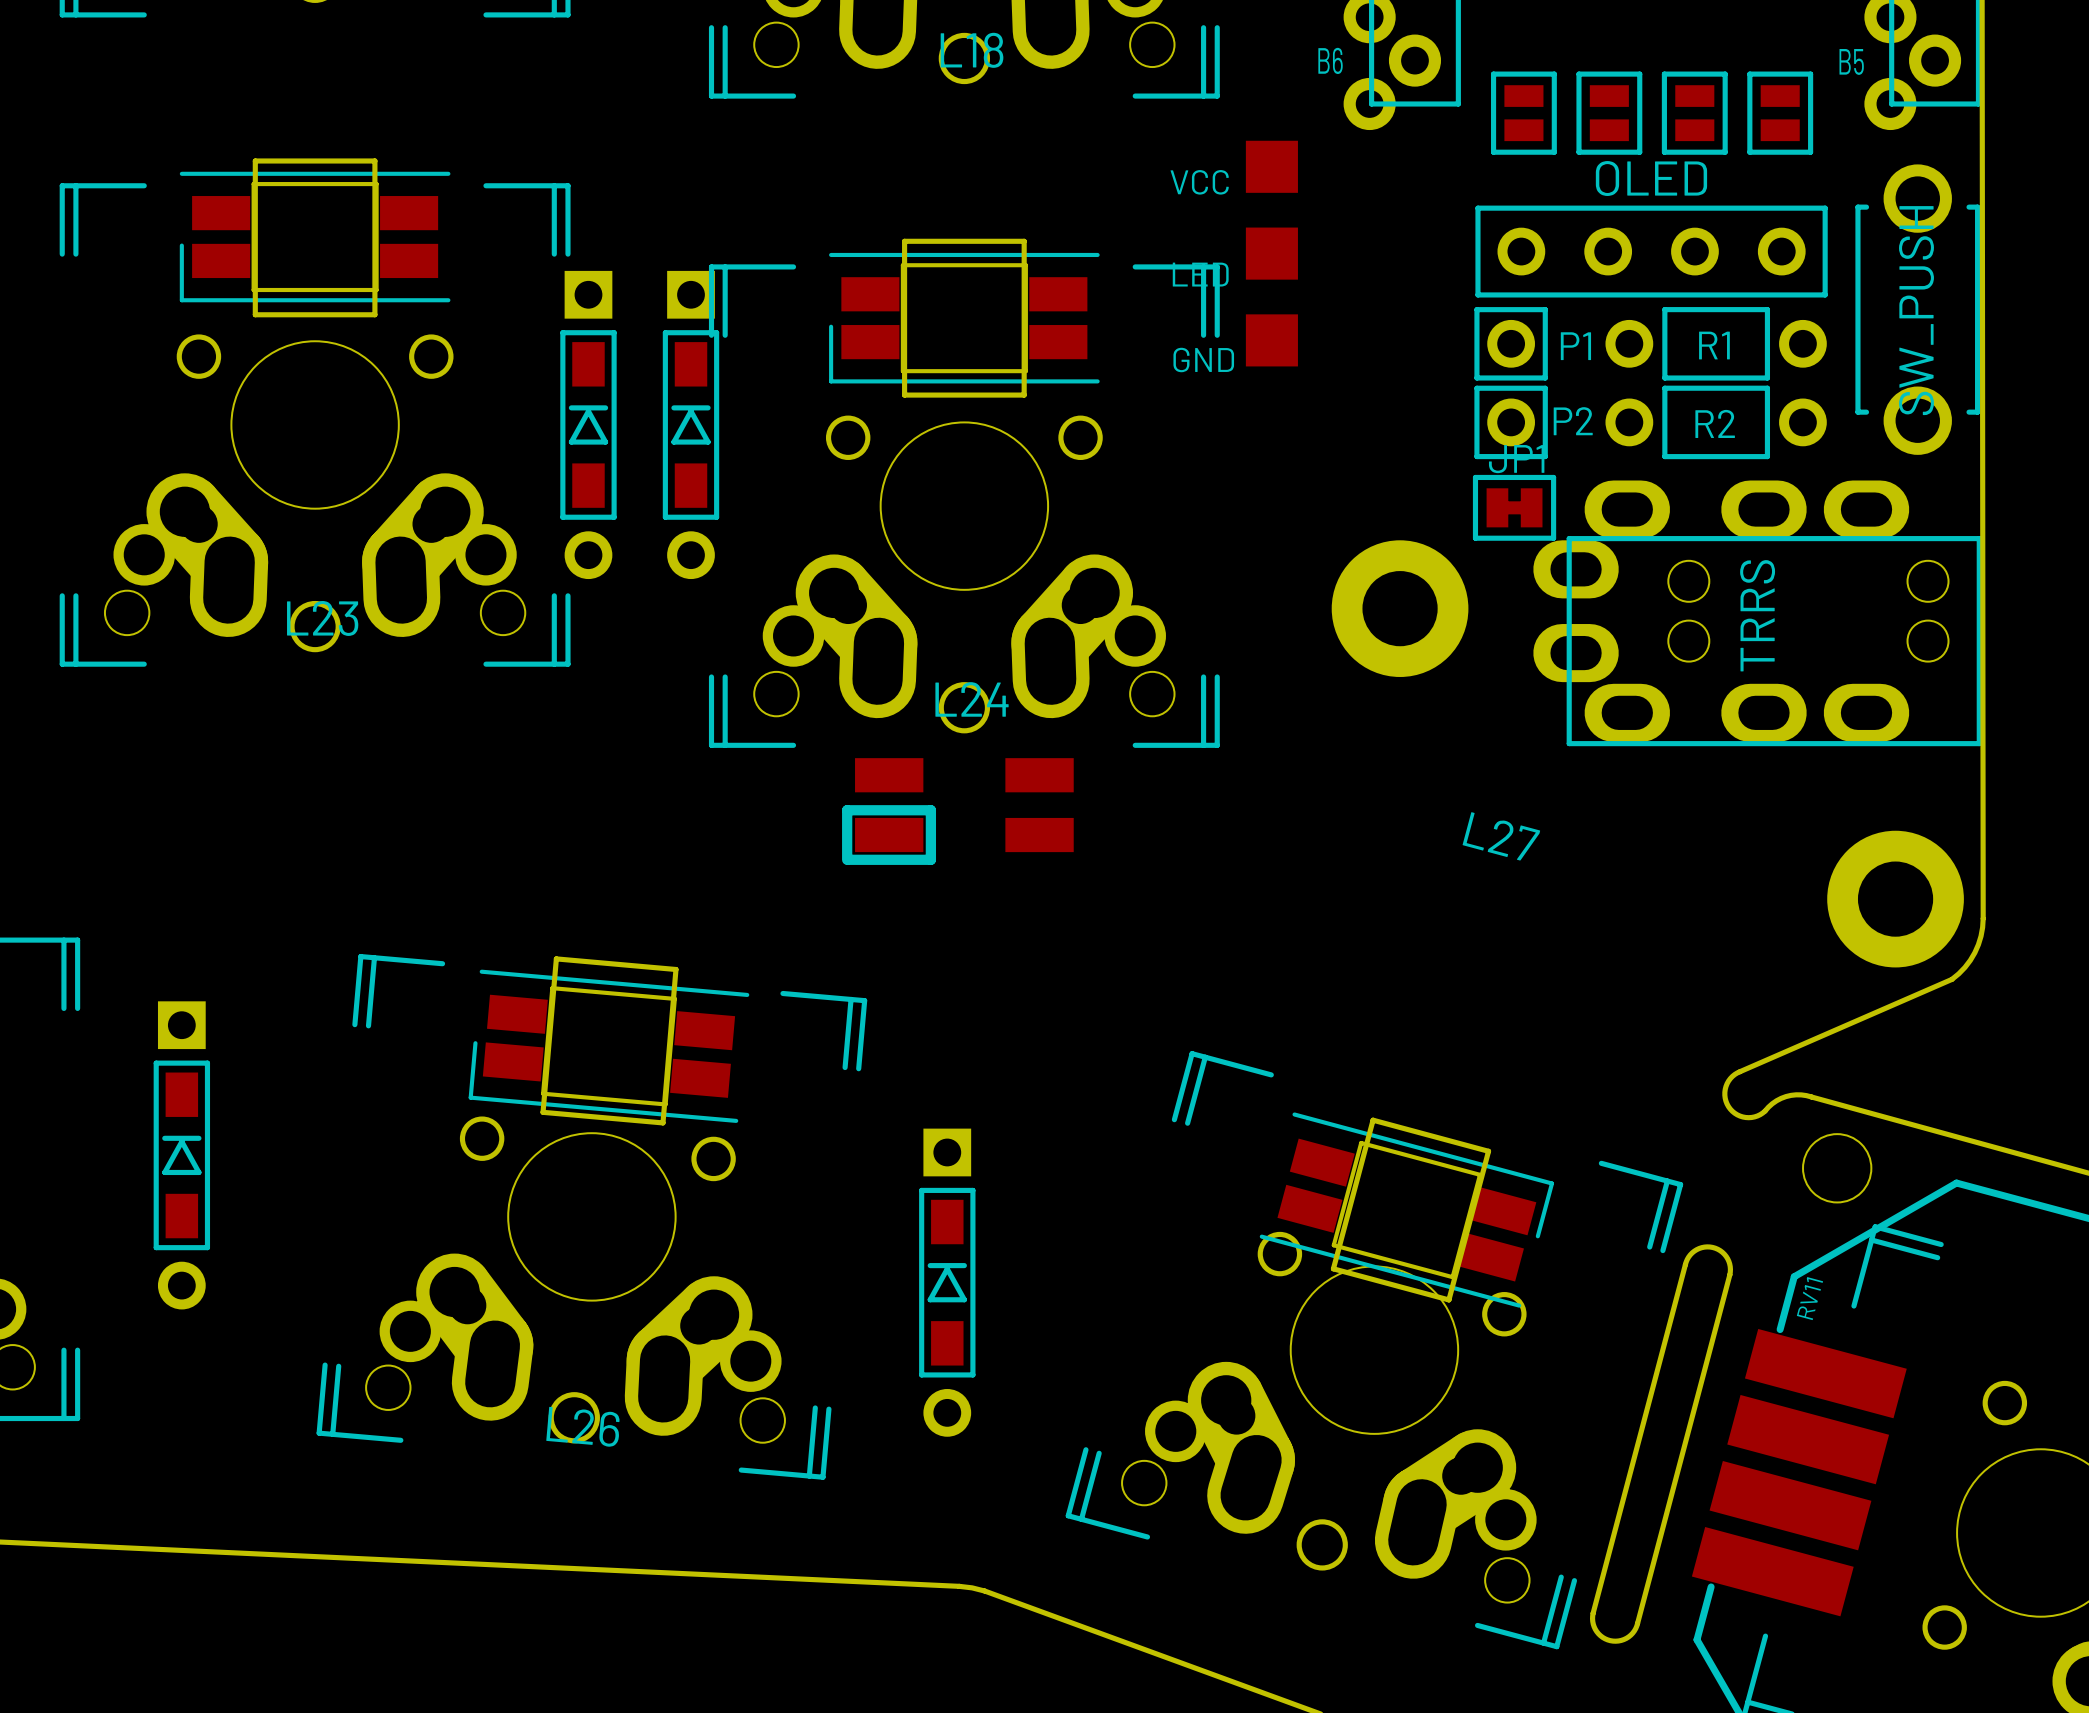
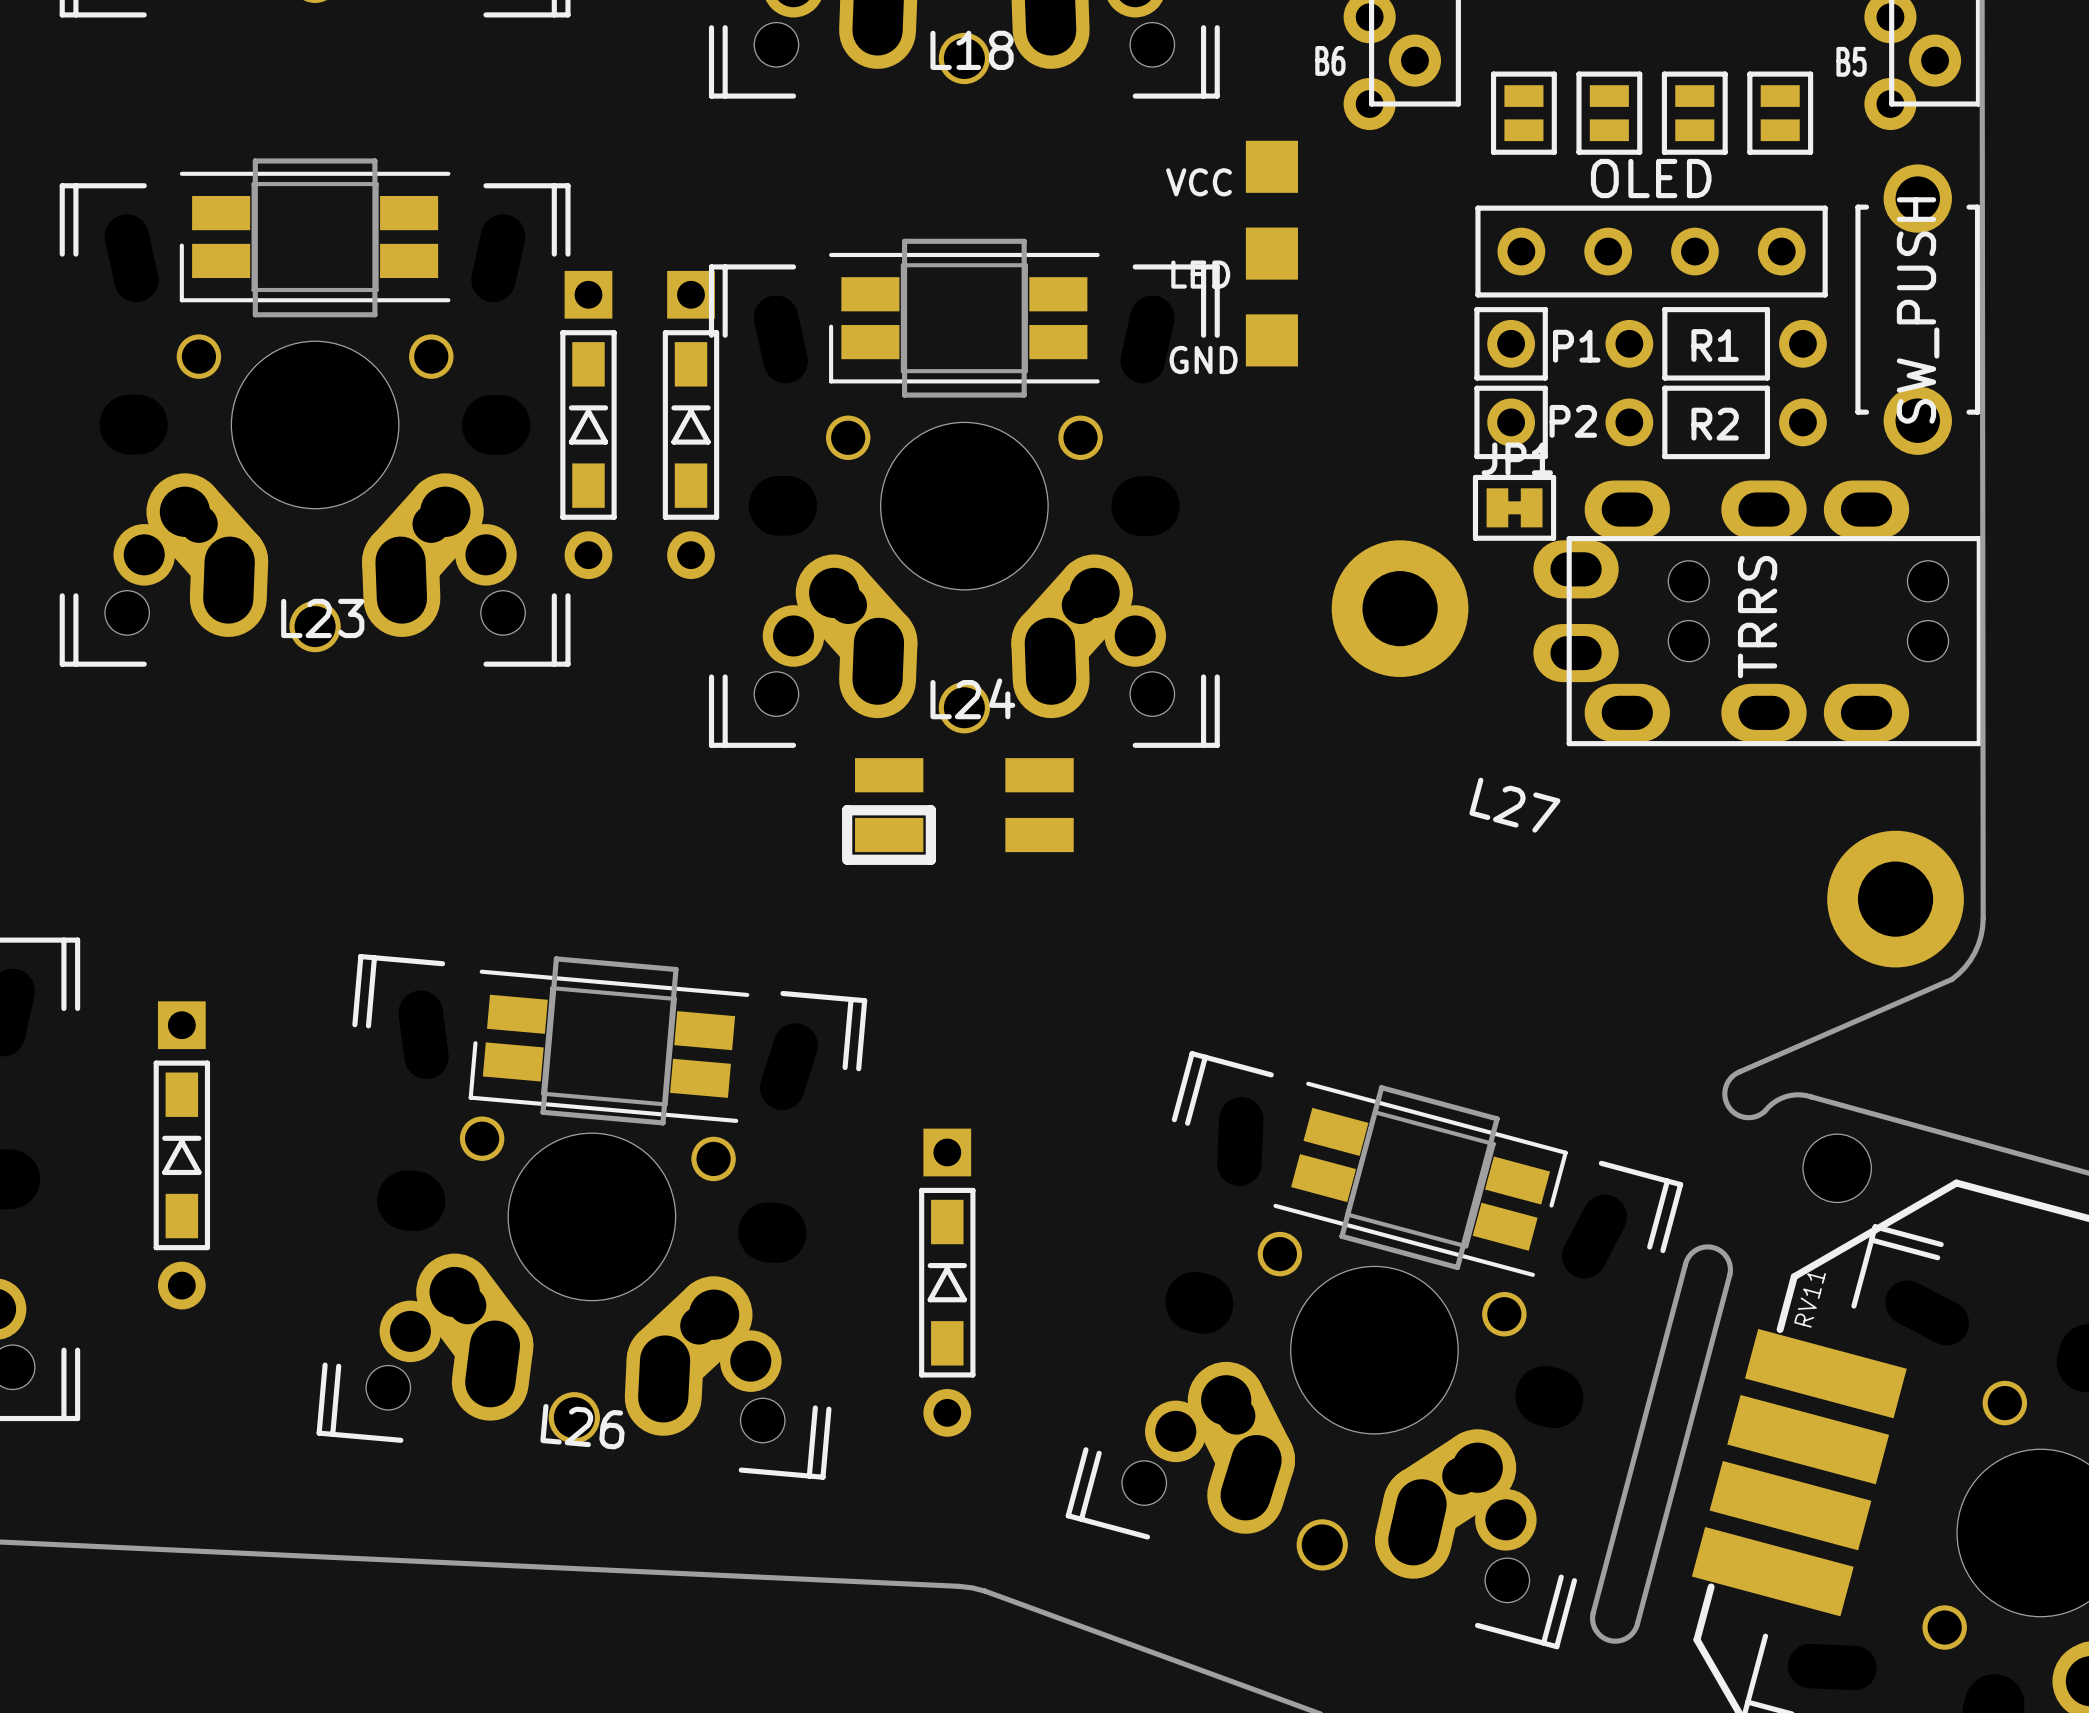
board edge: (1373, 1120) (1333, 1268) (1448, 1299) (1488, 1151) (1373, 1120) -> (1381, 1087) (1341, 1236) (1457, 1267) (1497, 1118) (1381, 1087)
L27 position: (1406, 1210) -> (1420, 1179)

